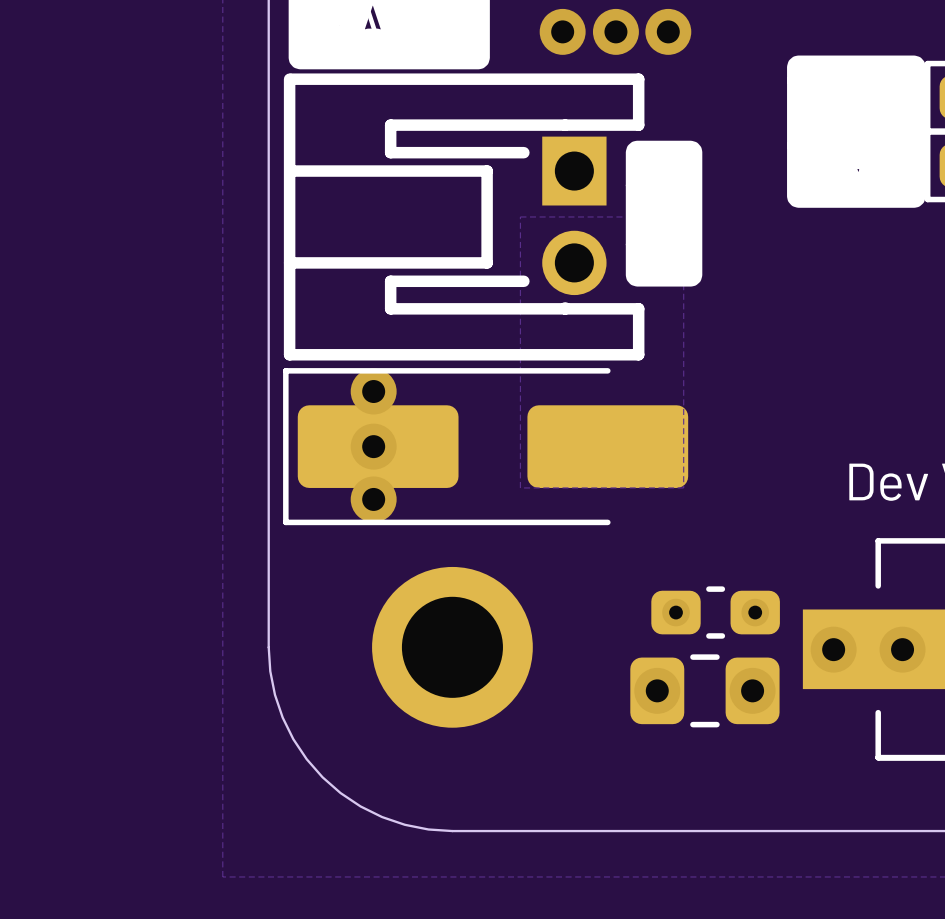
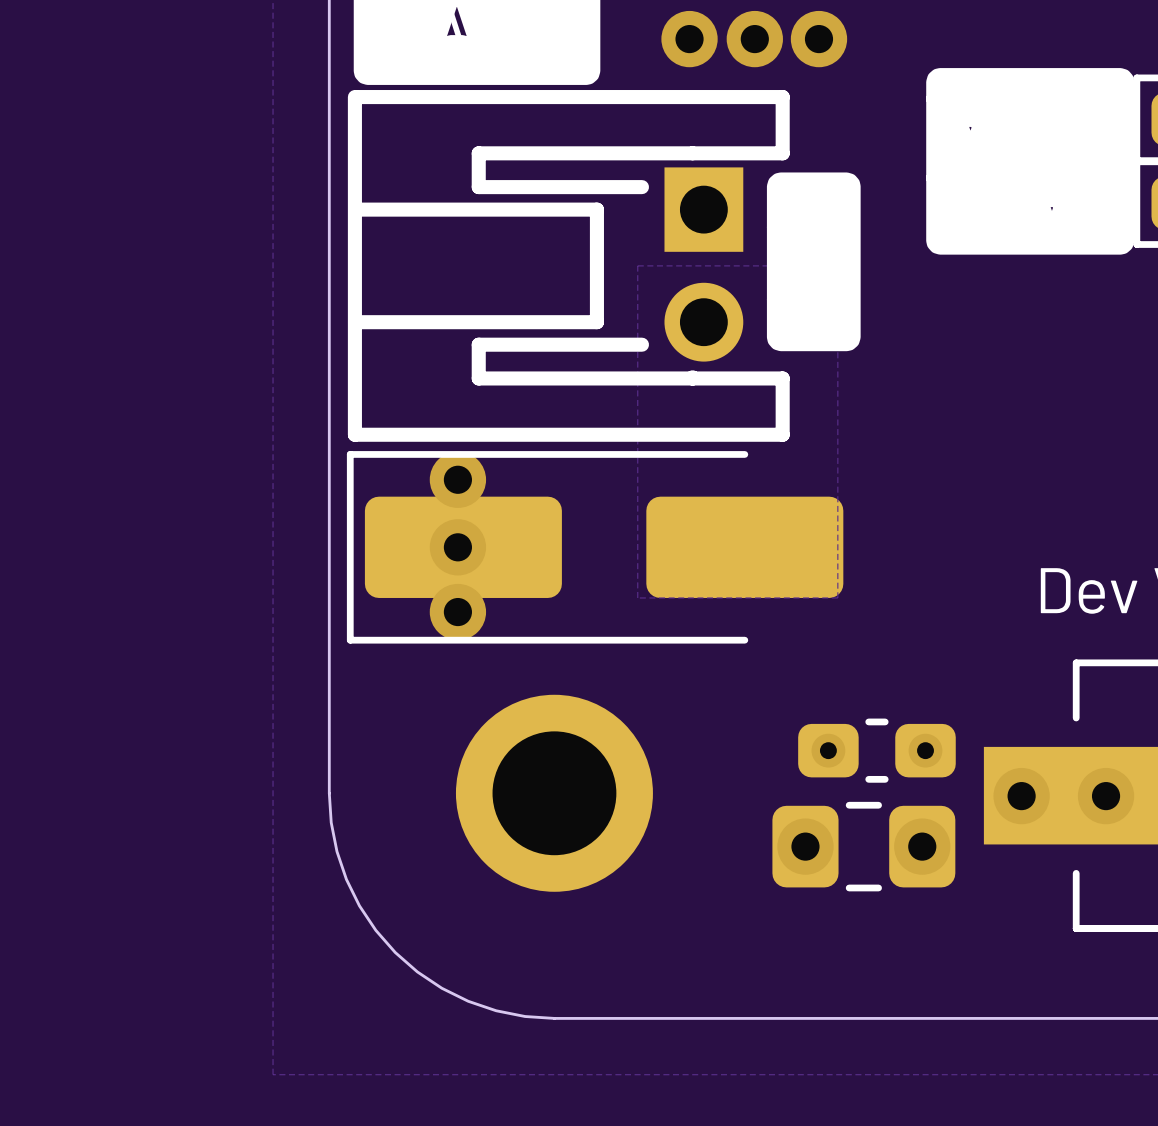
drawing shape: [787, 55, 926, 208] -> [926, 68, 1135, 255]

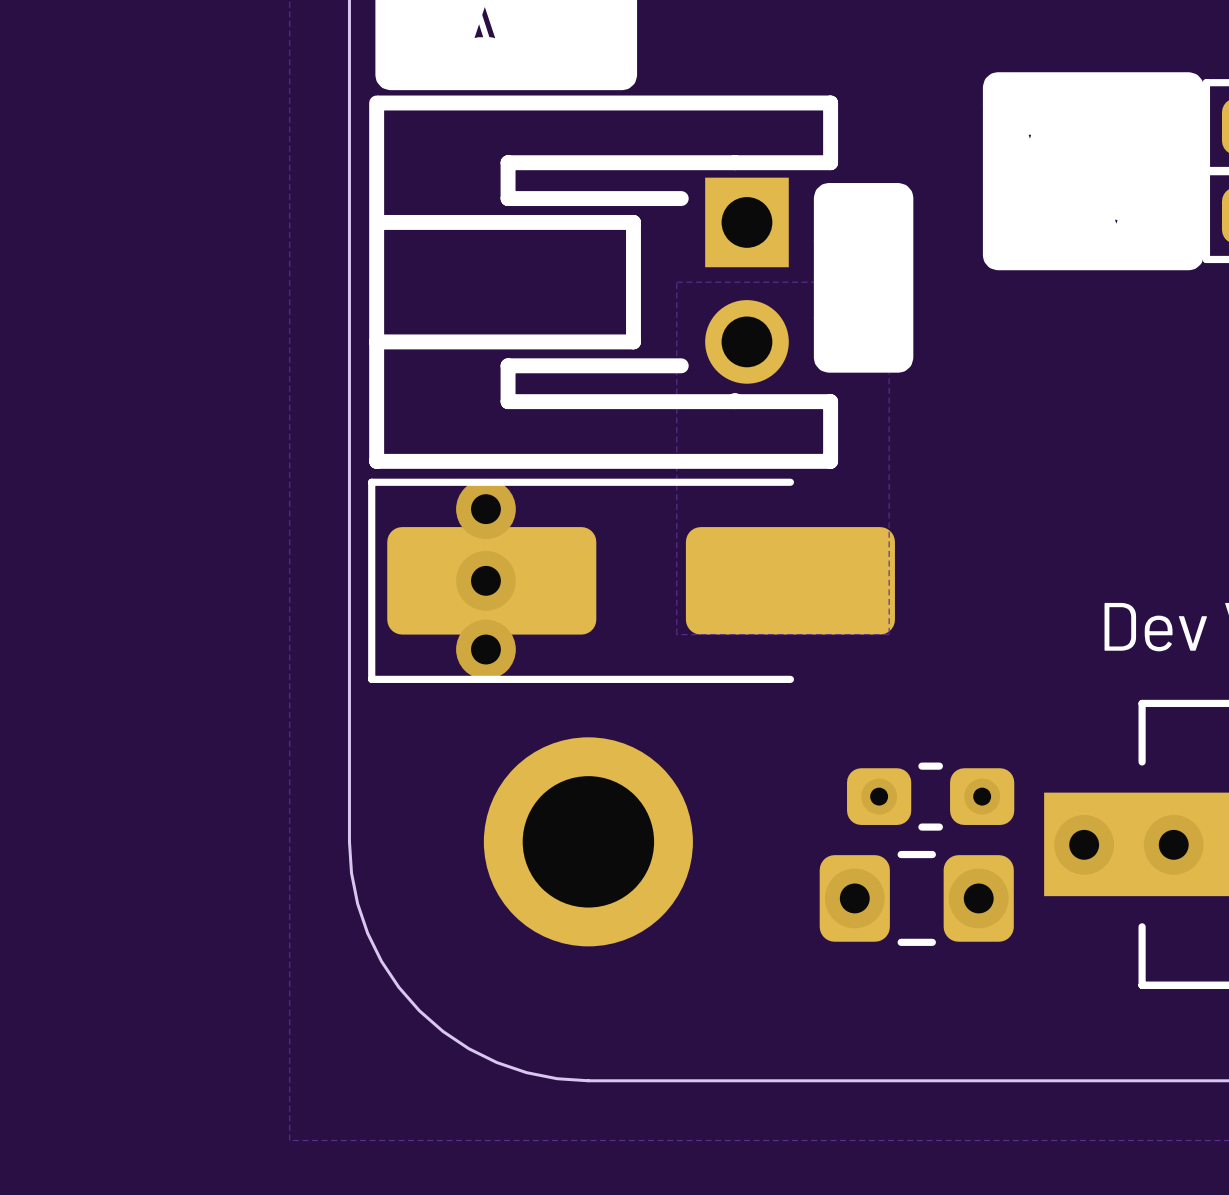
via: (689, 39) -> none
via: (754, 39) -> none
via: (818, 39) -> none

